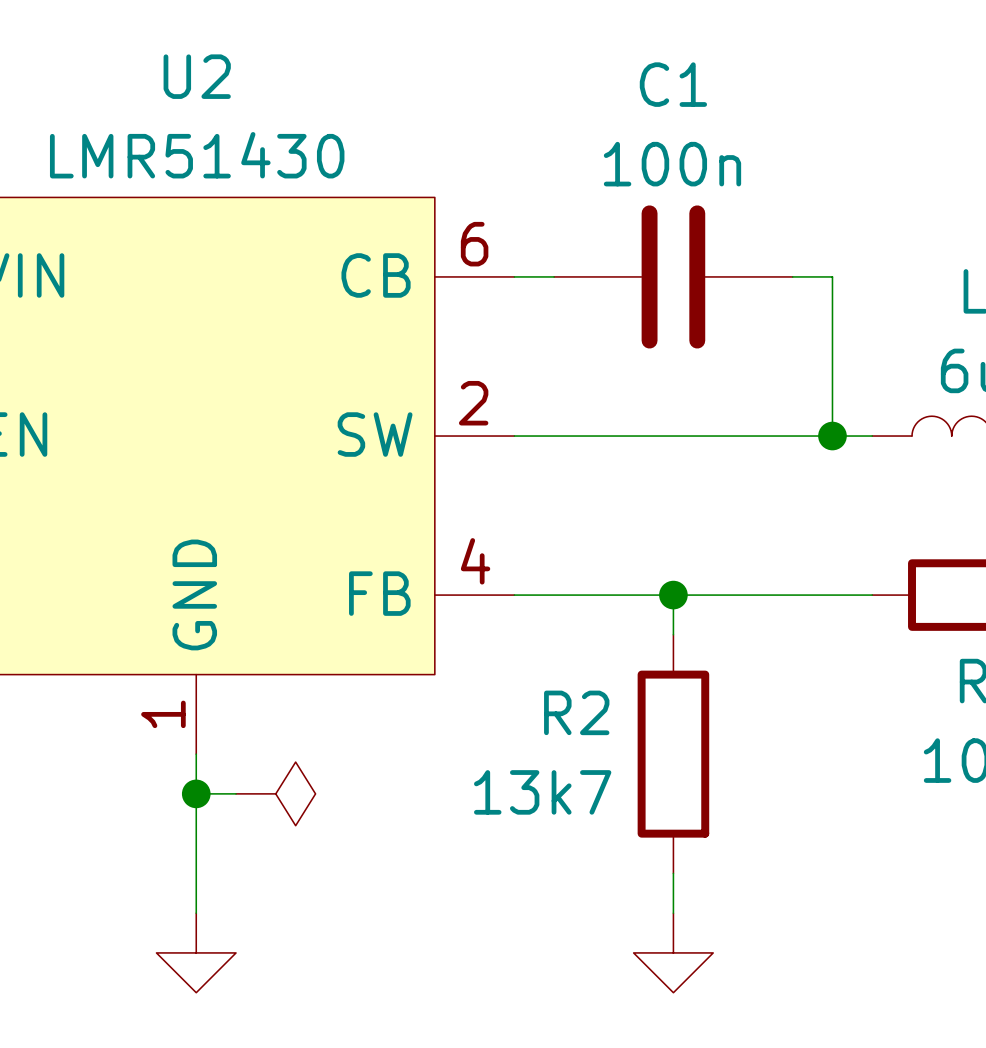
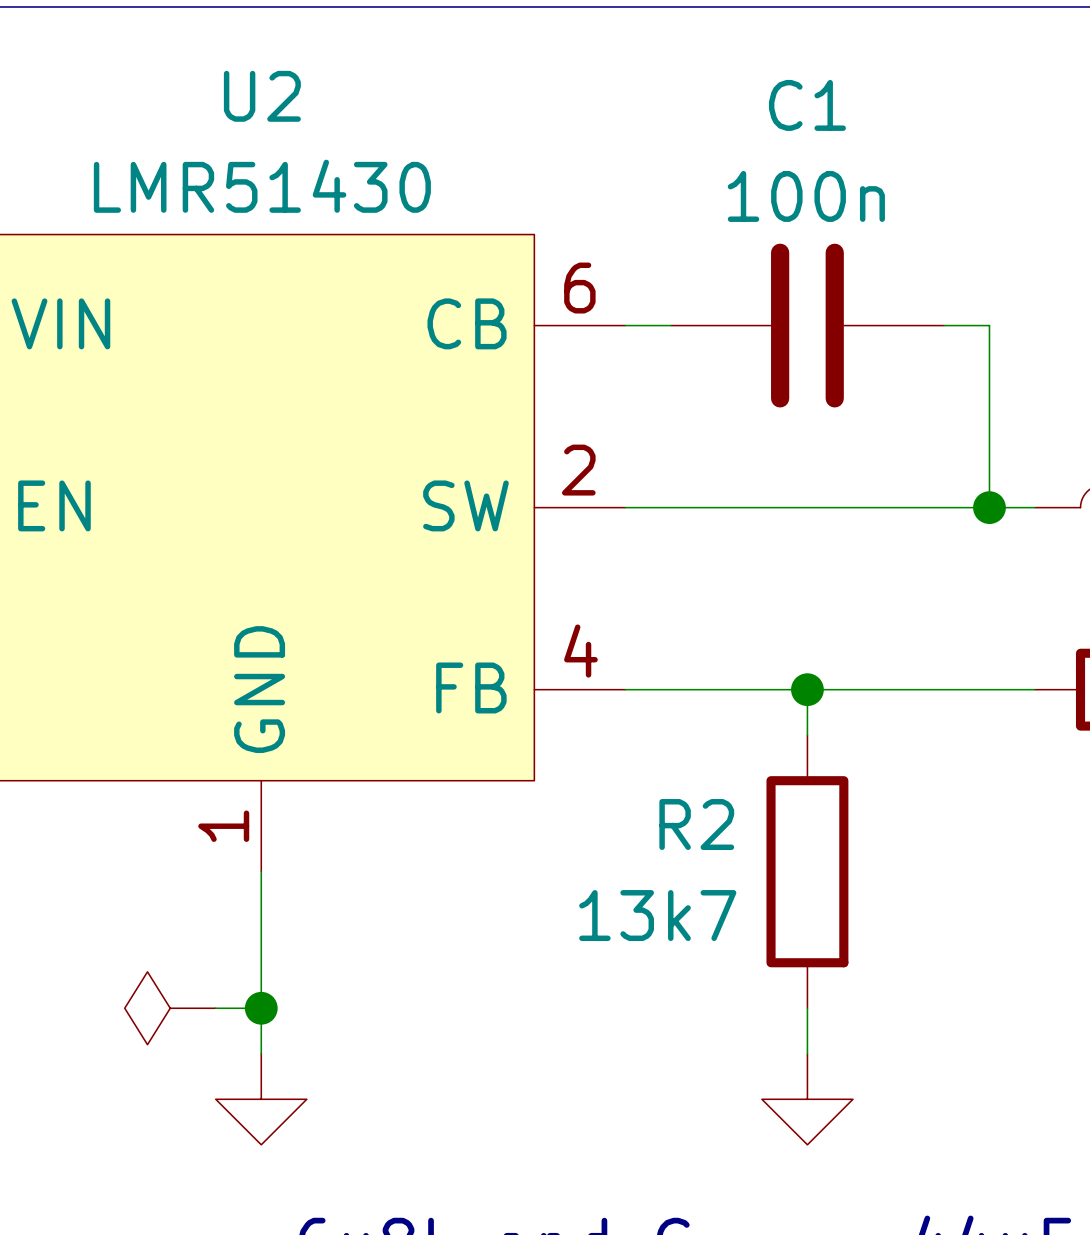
wire: (196, 793) (236, 793) -> (215, 1008) (261, 1008)
junction position: (196, 793) -> (261, 1008)
power symbol rotation: 0° (275, 793) -> 180° (170, 1008)
power symbol position: (275, 793) -> (170, 1008)

